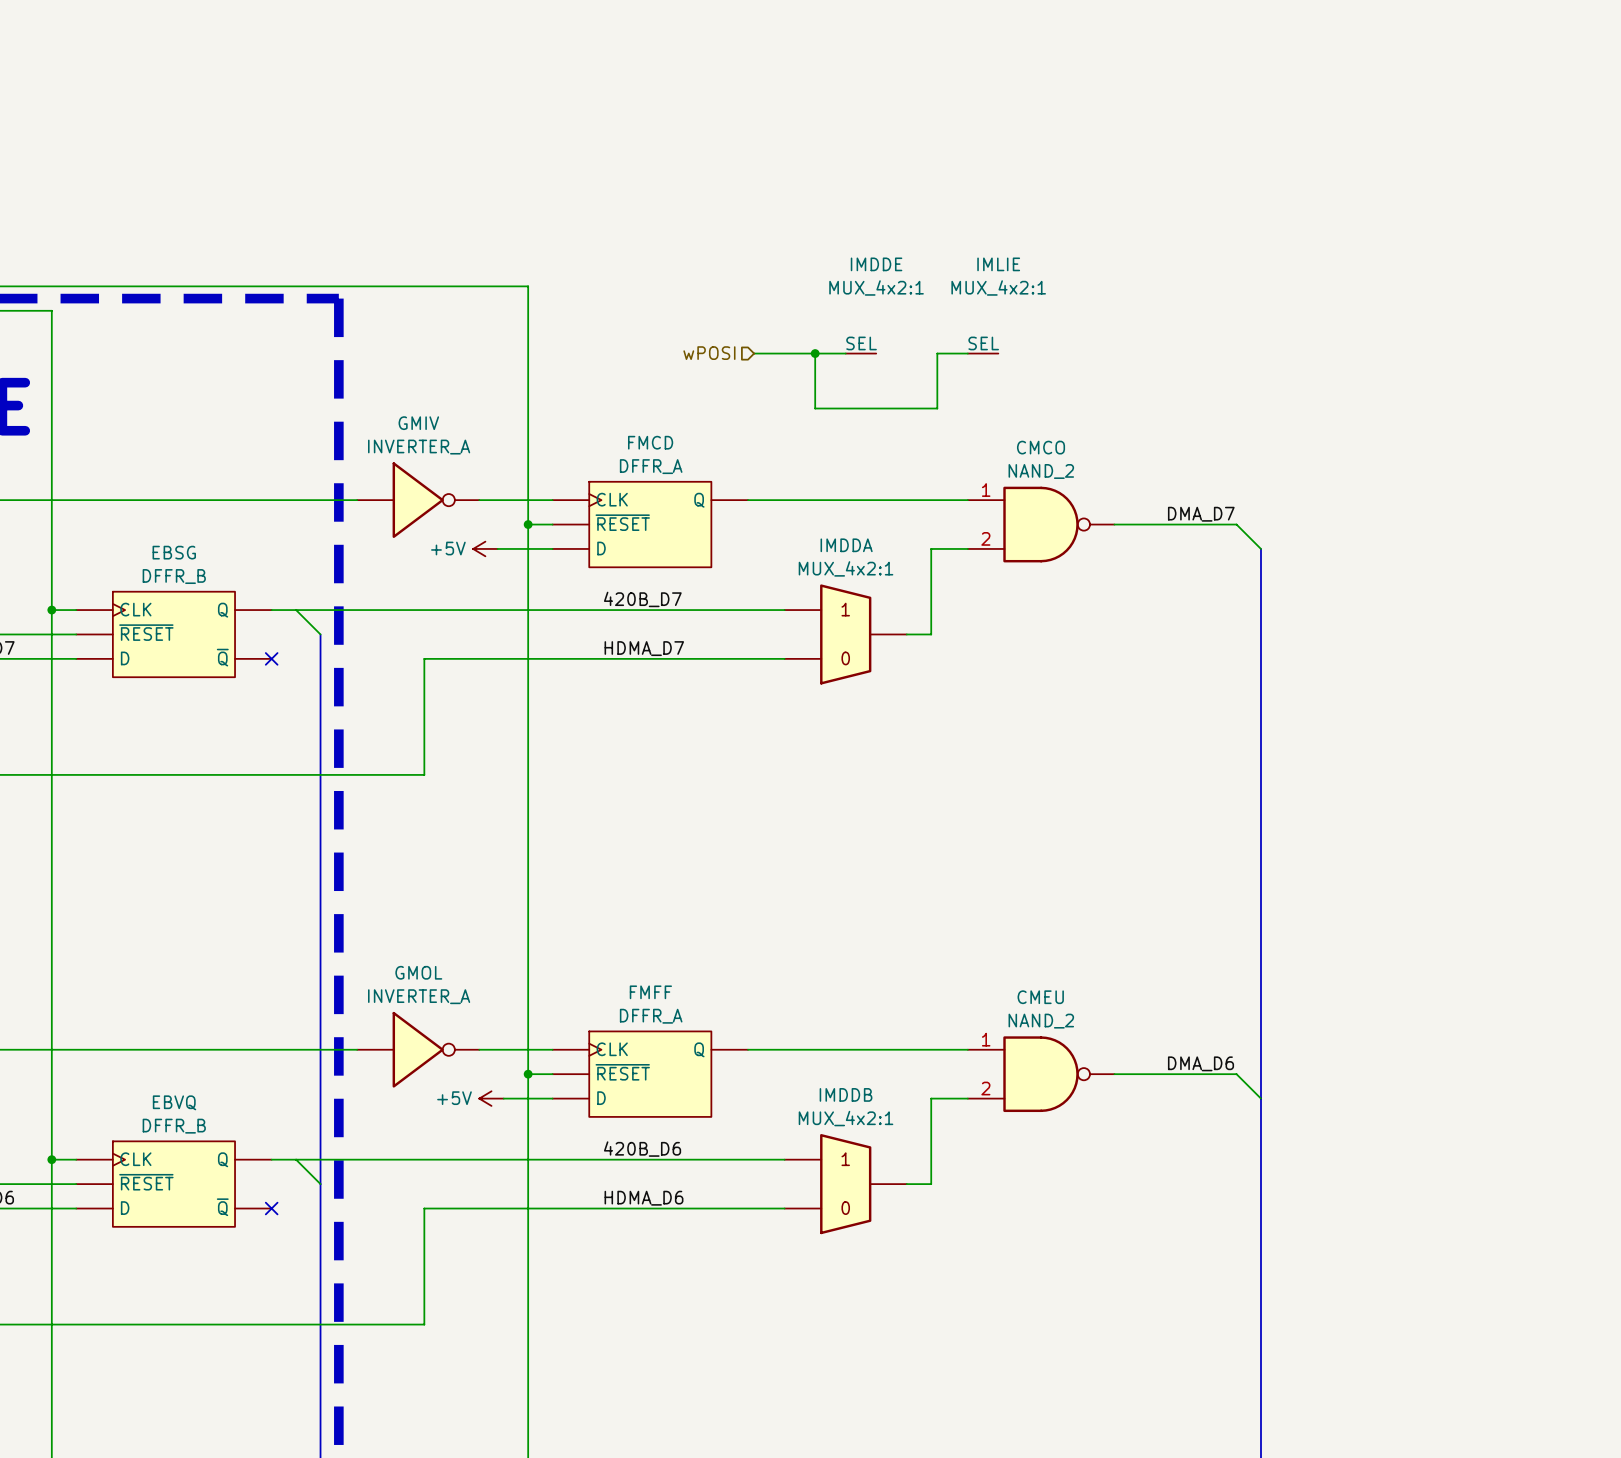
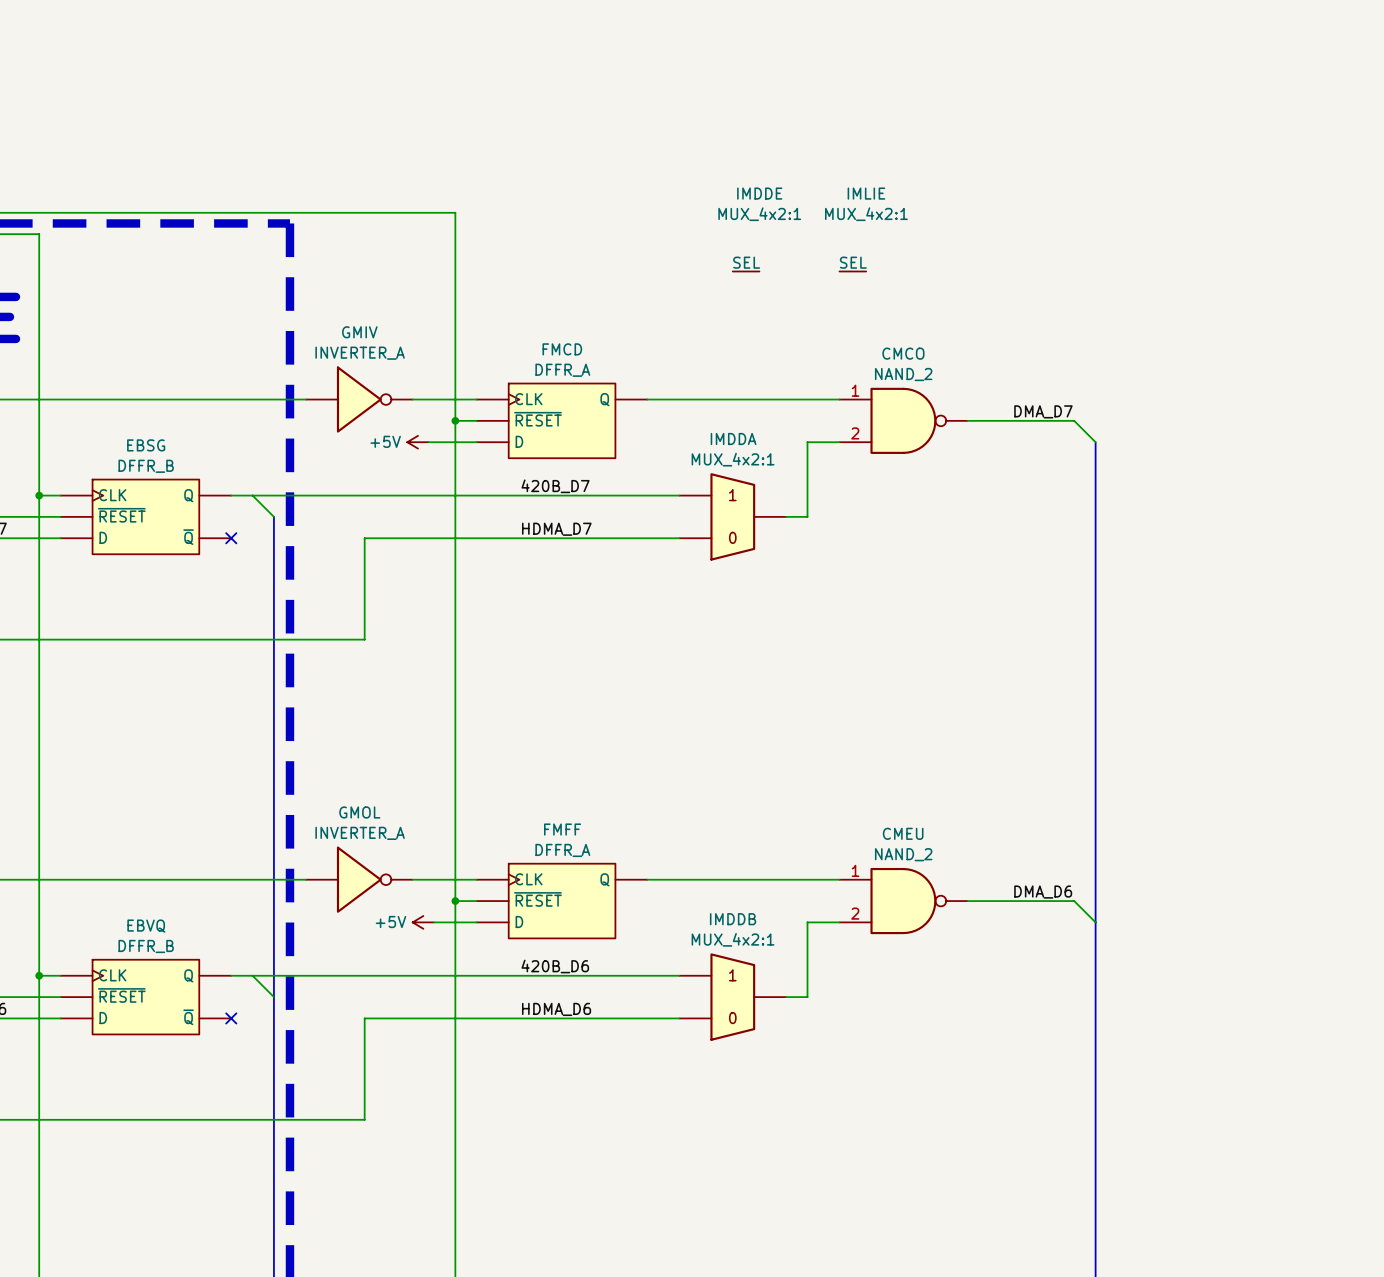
hierarchical label: wPOSI (709, 353) -> none
wire: (754, 353) (845, 353) -> none
wire: (815, 353) (815, 408) (937, 408) (937, 353) (967, 353) -> none
junction: (815, 353) -> none

